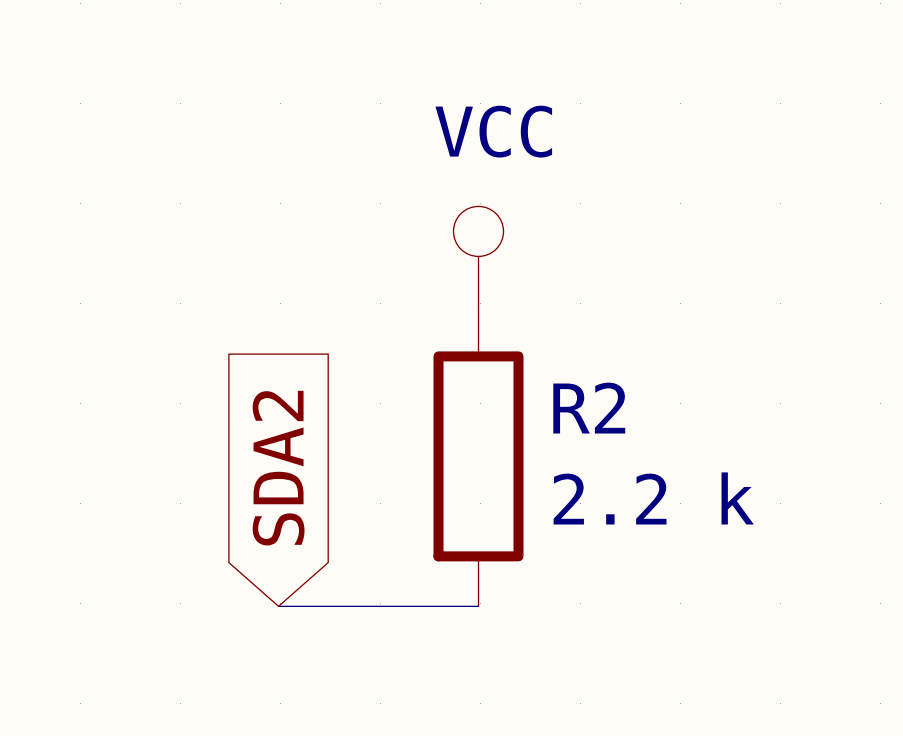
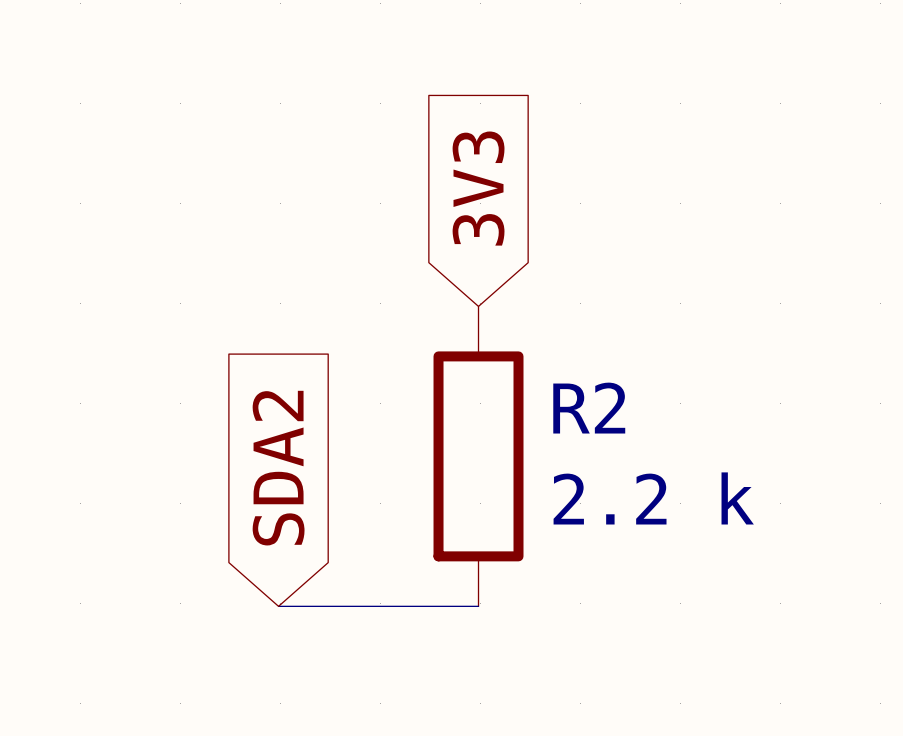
global label: none -> 3V3 (478, 188)
power symbol: VCC (478, 256) -> none

